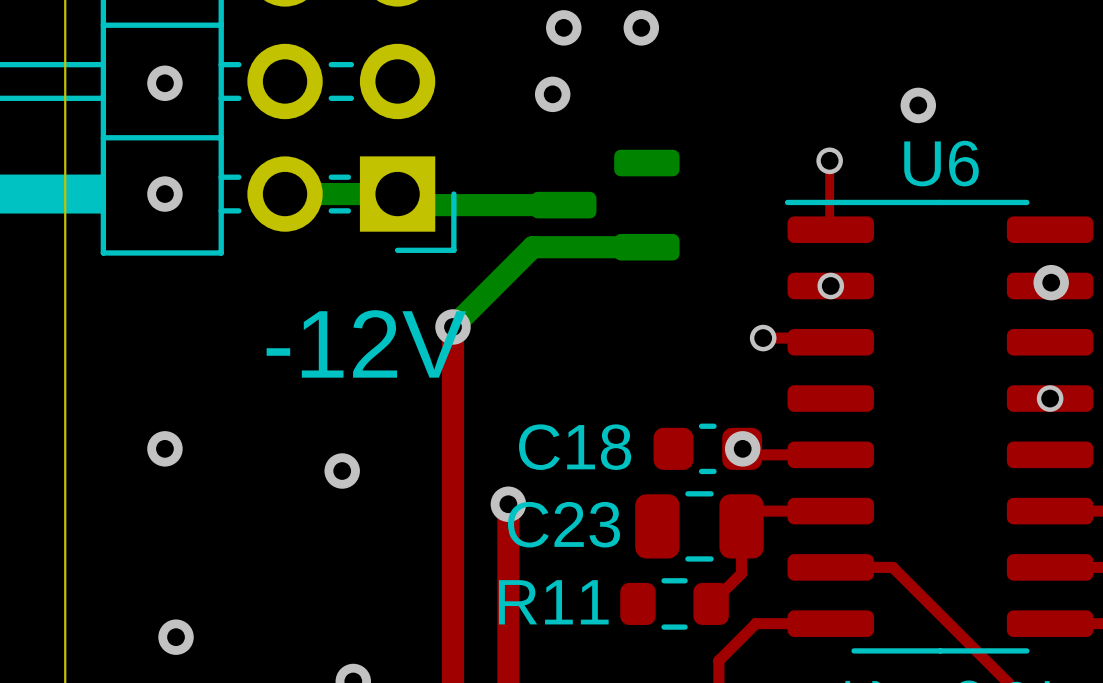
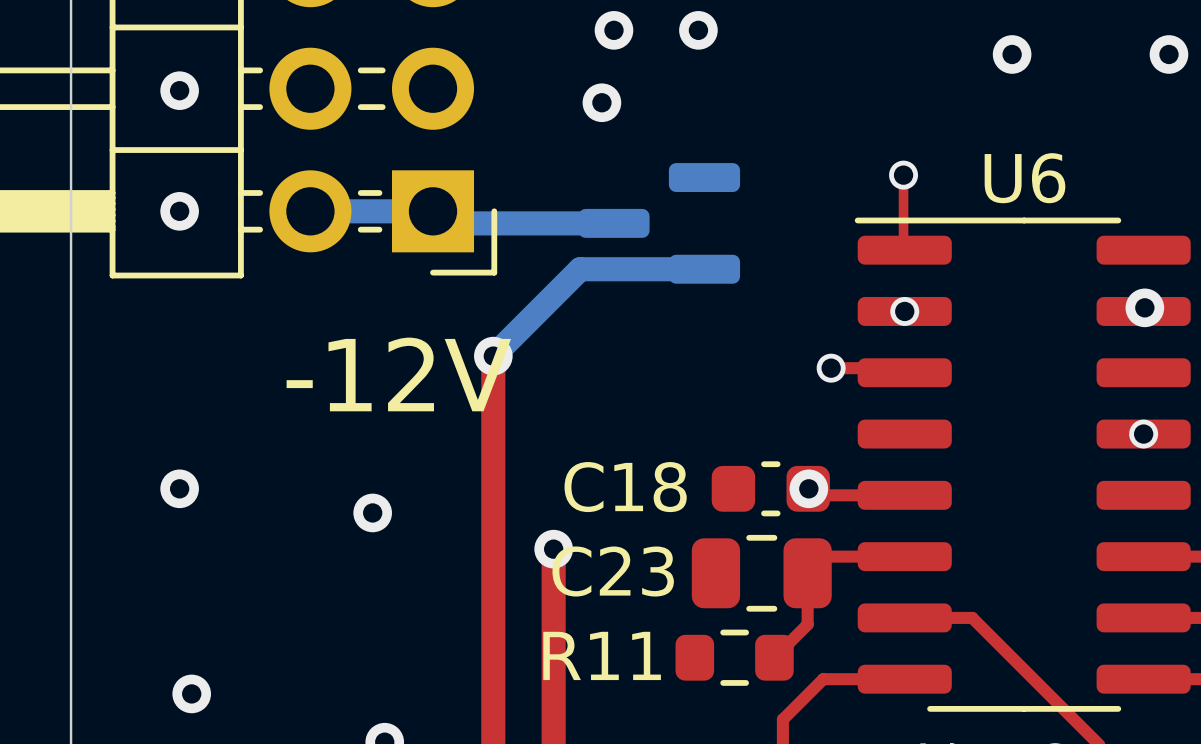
via: none -> (1168, 54)
via position: (918, 105) -> (1012, 54)

